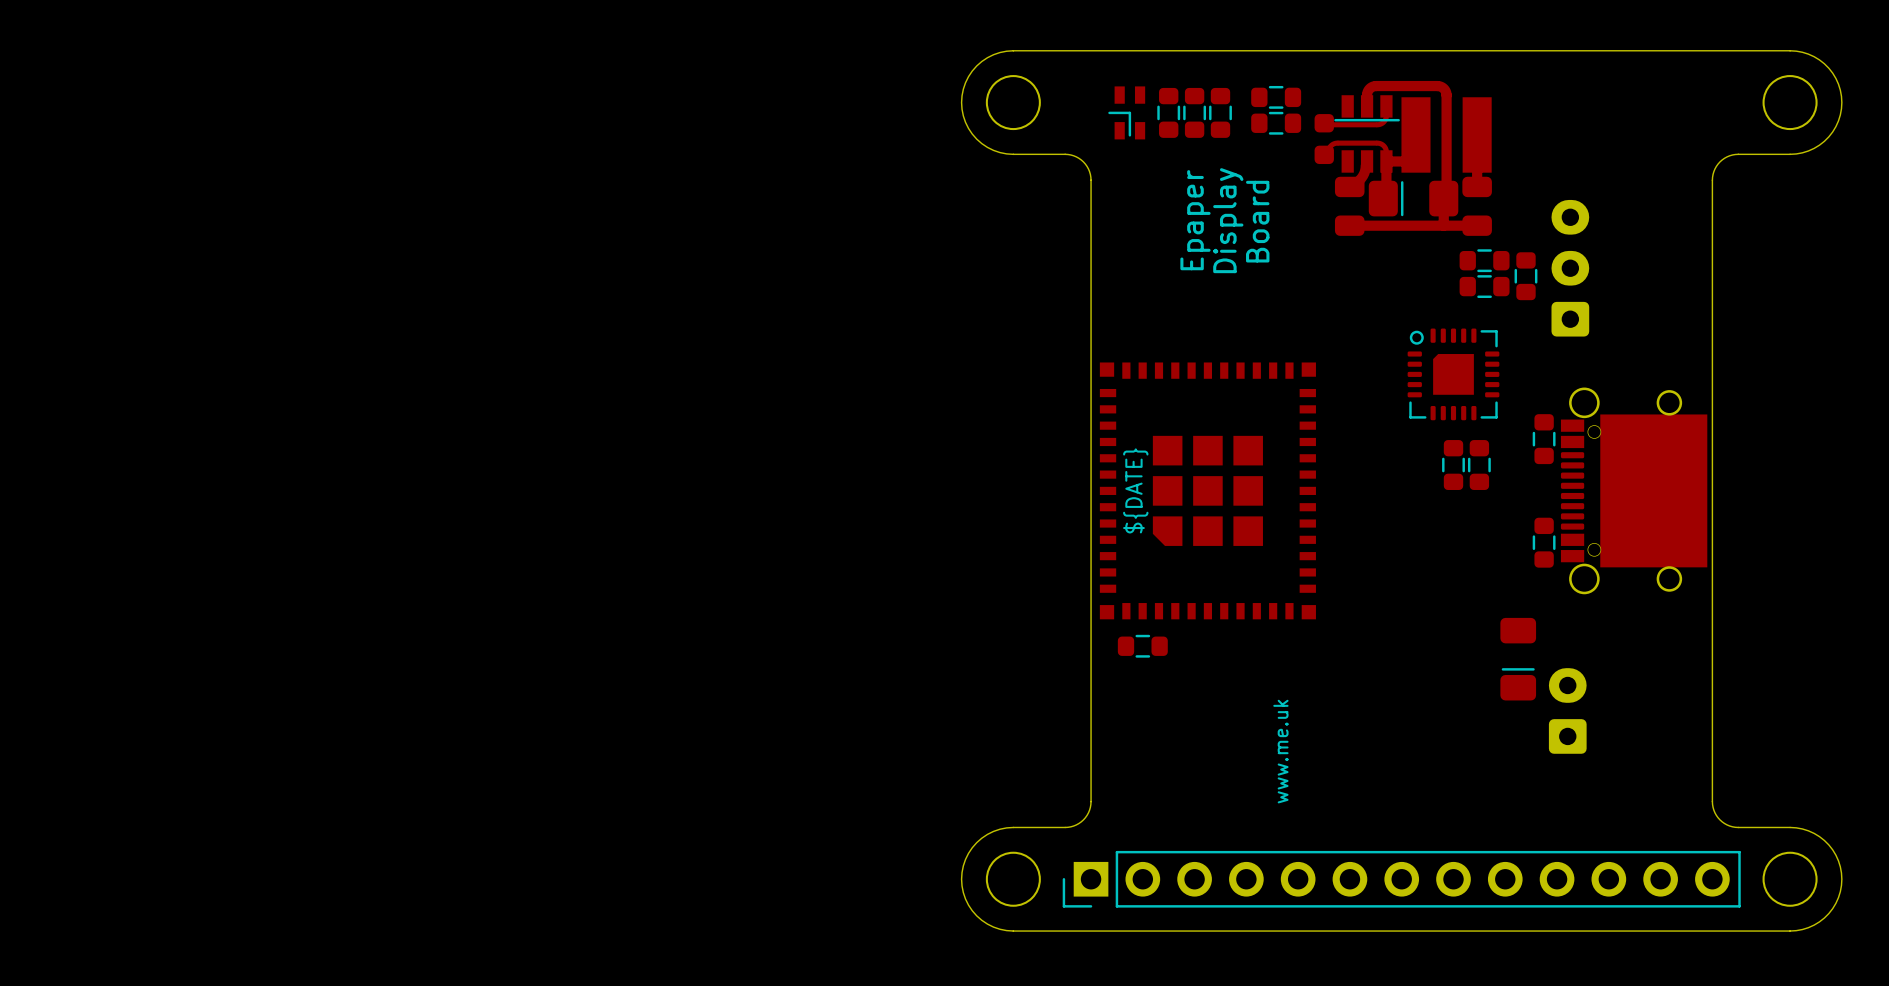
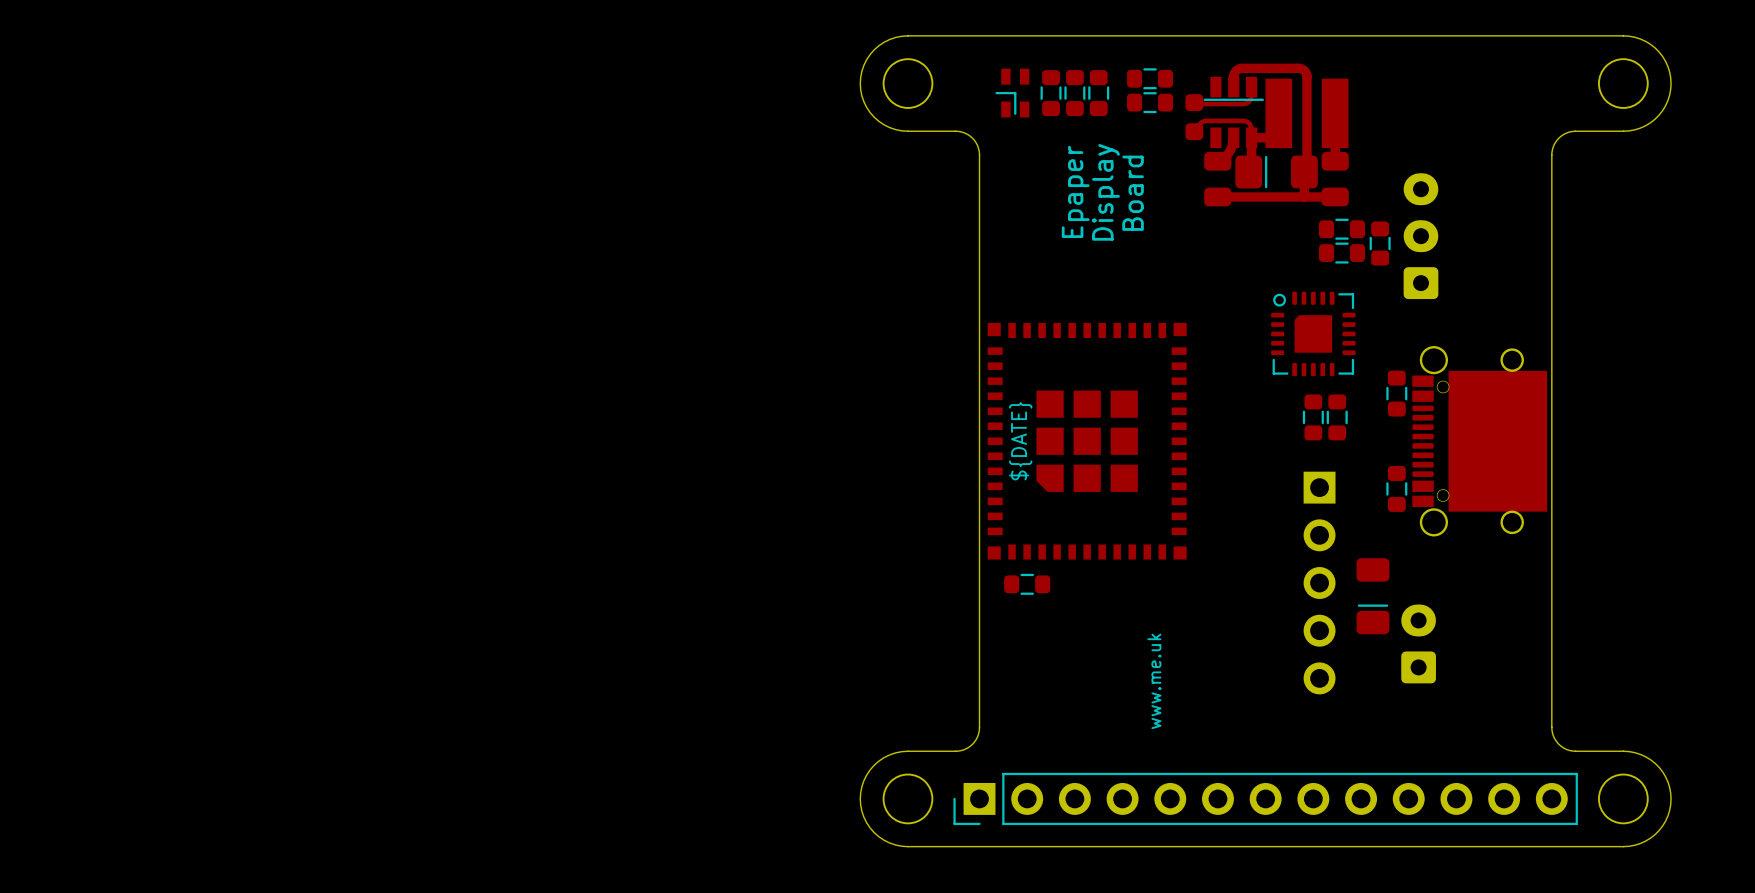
part: none -> (1319, 583)

